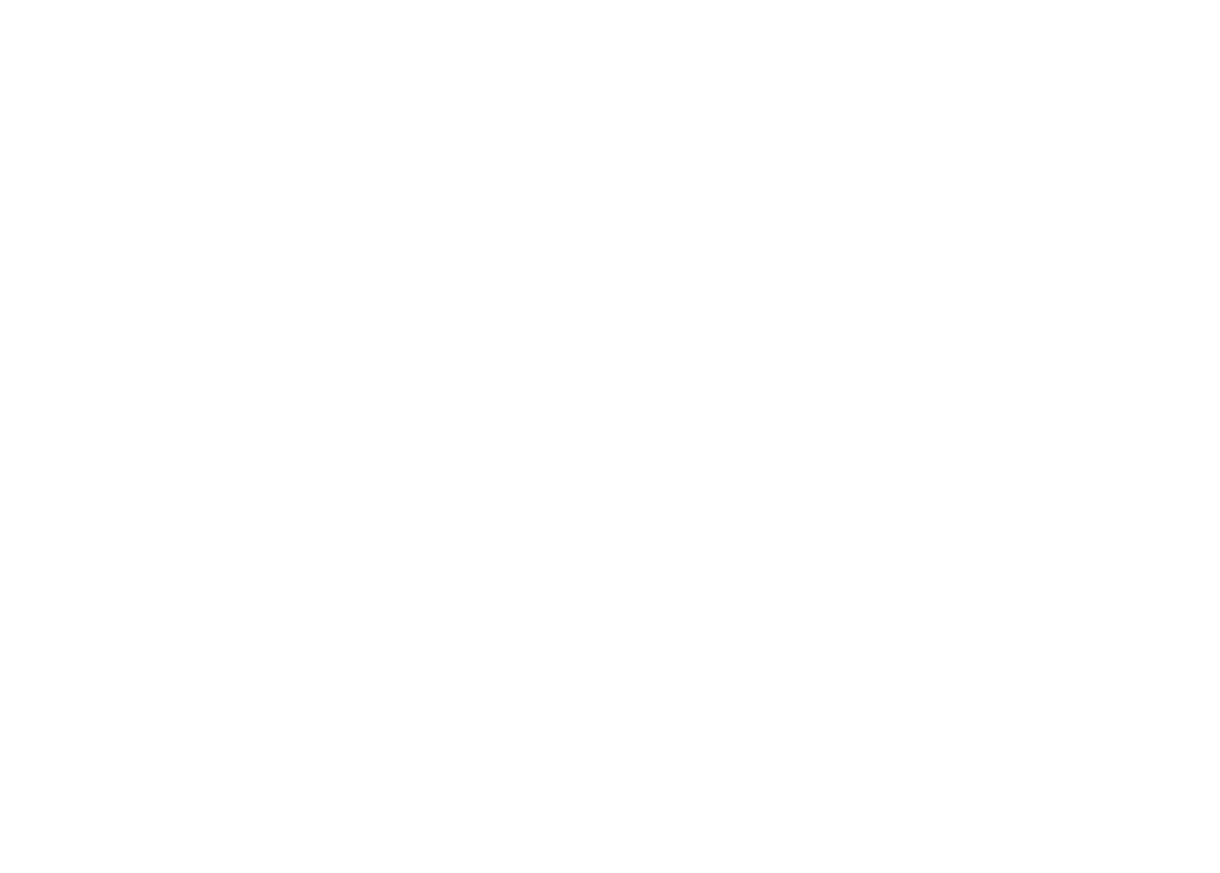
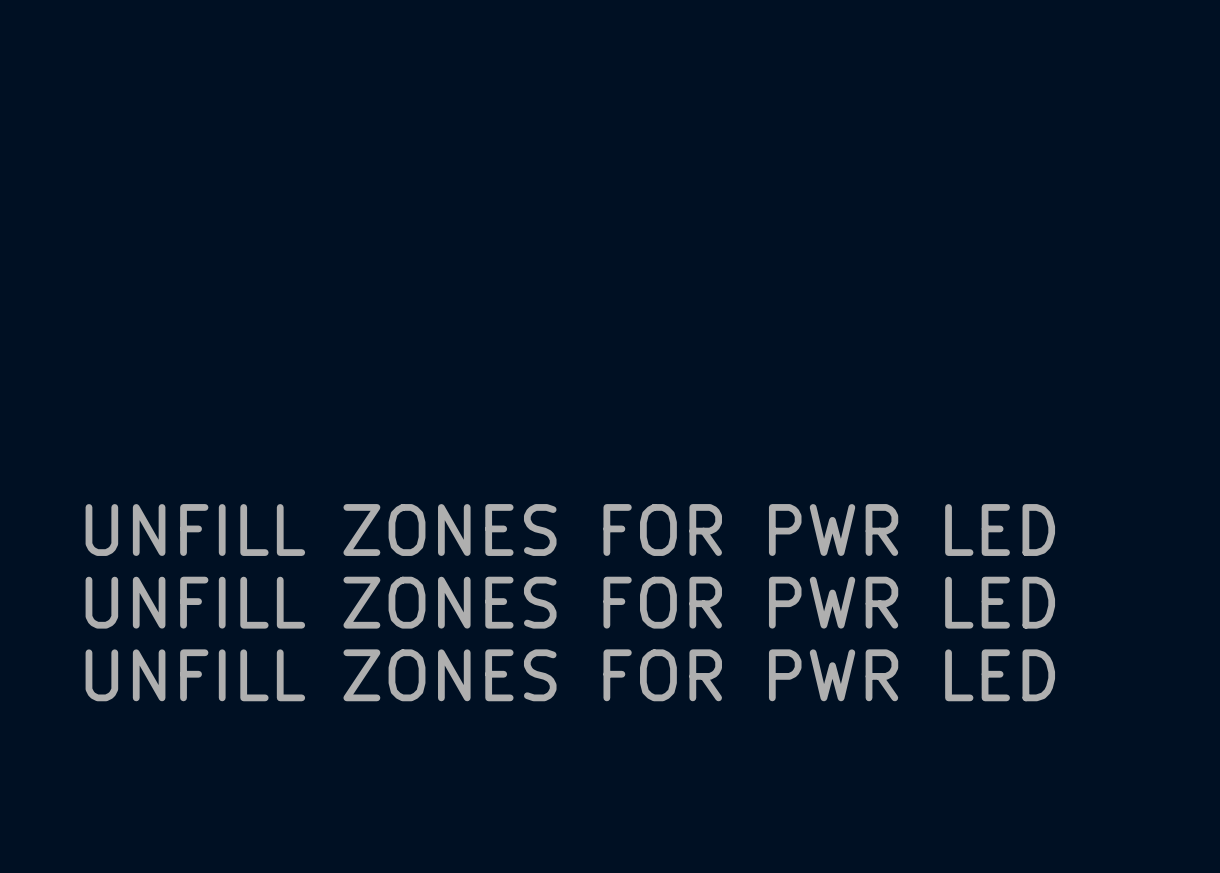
text: none -> UNFILL ZONES FOR PWR LED (570, 530)
text: none -> UNFILL ZONES FOR PWR LED (570, 602)
text: none -> UNFILL ZONES FOR PWR LED (570, 675)

